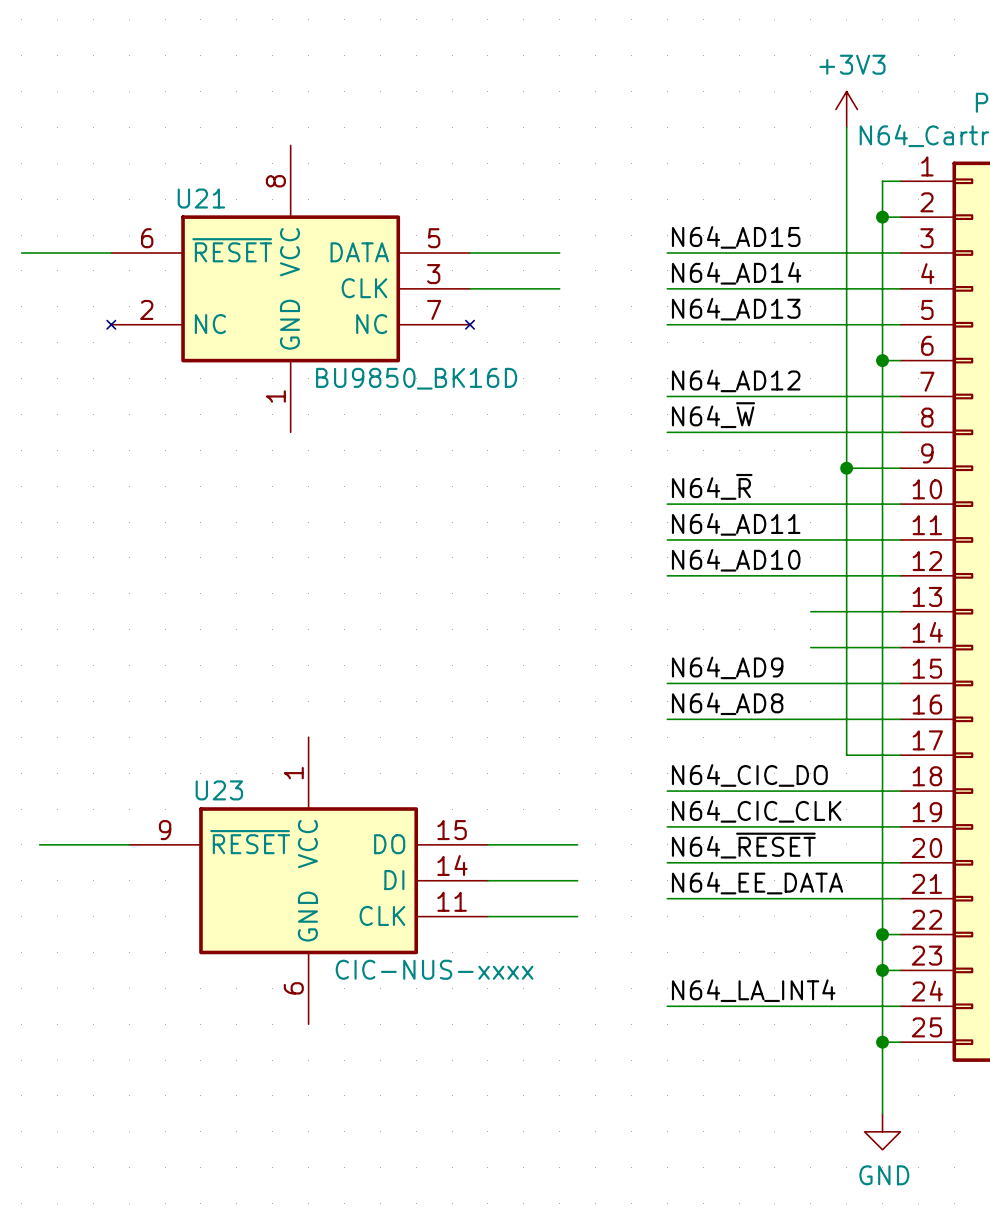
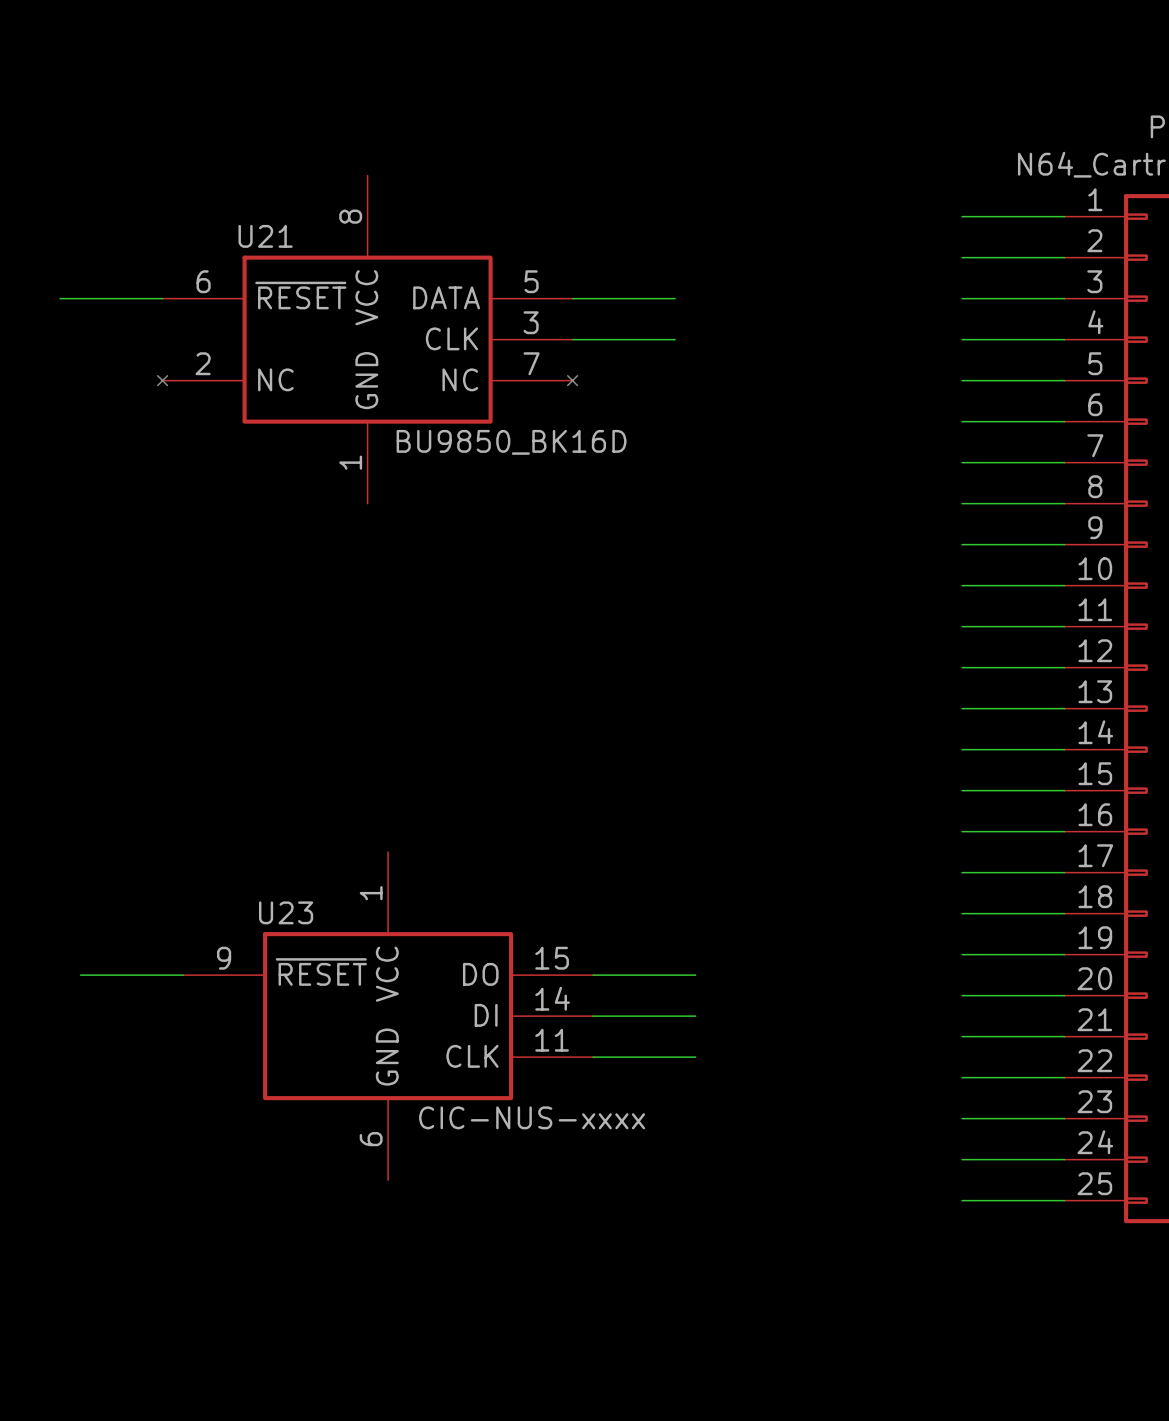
power symbol: +3V3 (846, 109) -> none
wire: (846, 127) (846, 755) -> (962, 872) (1003, 872)
wire: (882, 181) (882, 1113) -> (1044, 216) (962, 216)
wire: none -> (962, 257) (1044, 257)
junction: (882, 217) -> none
label: N64_AD15 (736, 237) -> none
wire: (667, 253) (810, 253) -> none
label: N64_AD14 (736, 273) -> none
wire: (667, 288) (810, 288) -> none
label: N64_AD13 (736, 309) -> none
wire: (667, 324) (810, 324) -> none
wire: none -> (962, 421) (1044, 421)
junction: (882, 360) -> none
label: N64_AD12 (736, 380) -> none
wire: (667, 396) (810, 396) -> none
label: N64_~{W} (713, 415) -> none
wire: (667, 432) (810, 432) -> none
wire: none -> (962, 544) (1003, 544)
junction: (846, 468) -> none
label: N64_~{R} (712, 486) -> none
wire: (667, 504) (810, 504) -> none
label: N64_AD11 (736, 524) -> none
wire: (667, 539) (810, 539) -> none
label: N64_AD10 (736, 560) -> none
wire: (667, 575) (810, 575) -> none
label: N64_AD9 (727, 667) -> none
wire: (667, 683) (810, 683) -> none
label: N64_AD8 (727, 703) -> none
wire: (667, 719) (810, 719) -> none
label: N64_CIC_DO (749, 775) -> none
wire: (667, 791) (810, 791) -> none
label: N64_CIC_CLK (756, 811) -> none
wire: (667, 826) (810, 826) -> none
label: N64_~{RESET} (743, 845) -> none
wire: (667, 862) (810, 862) -> none
label: N64_EE_DATA (757, 883) -> none
wire: (667, 898) (810, 898) -> none
wire: none -> (962, 1077) (1044, 1077)
junction: (882, 934) -> none
wire: none -> (962, 1118) (1044, 1118)
junction: (882, 970) -> none
label: N64_LA_INT4 (753, 990) -> none
wire: (667, 1006) (810, 1006) -> none
wire: none -> (962, 1200) (1044, 1200)
junction: (882, 1042) -> none
power symbol: GND (882, 1131) -> none

